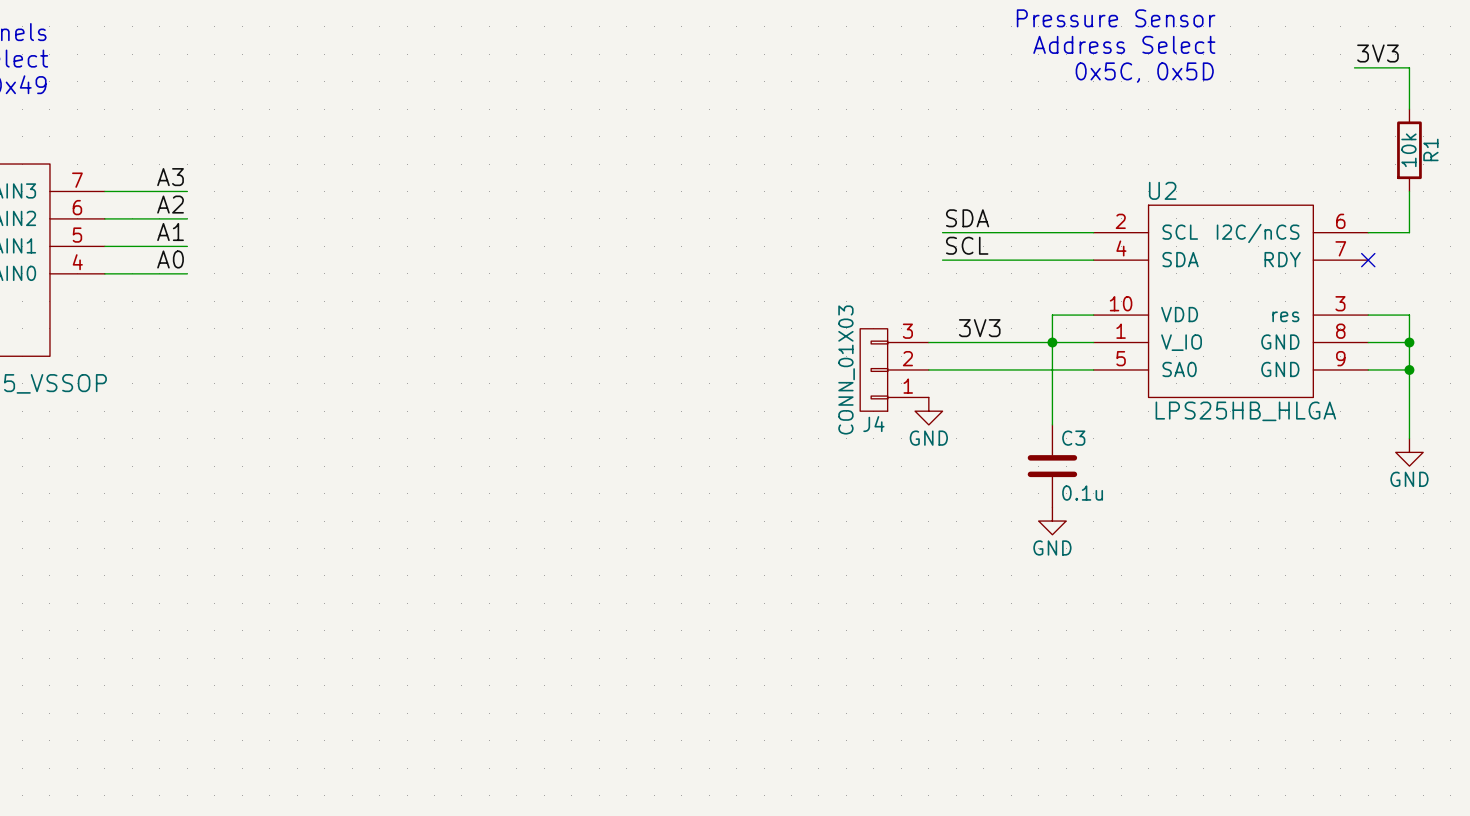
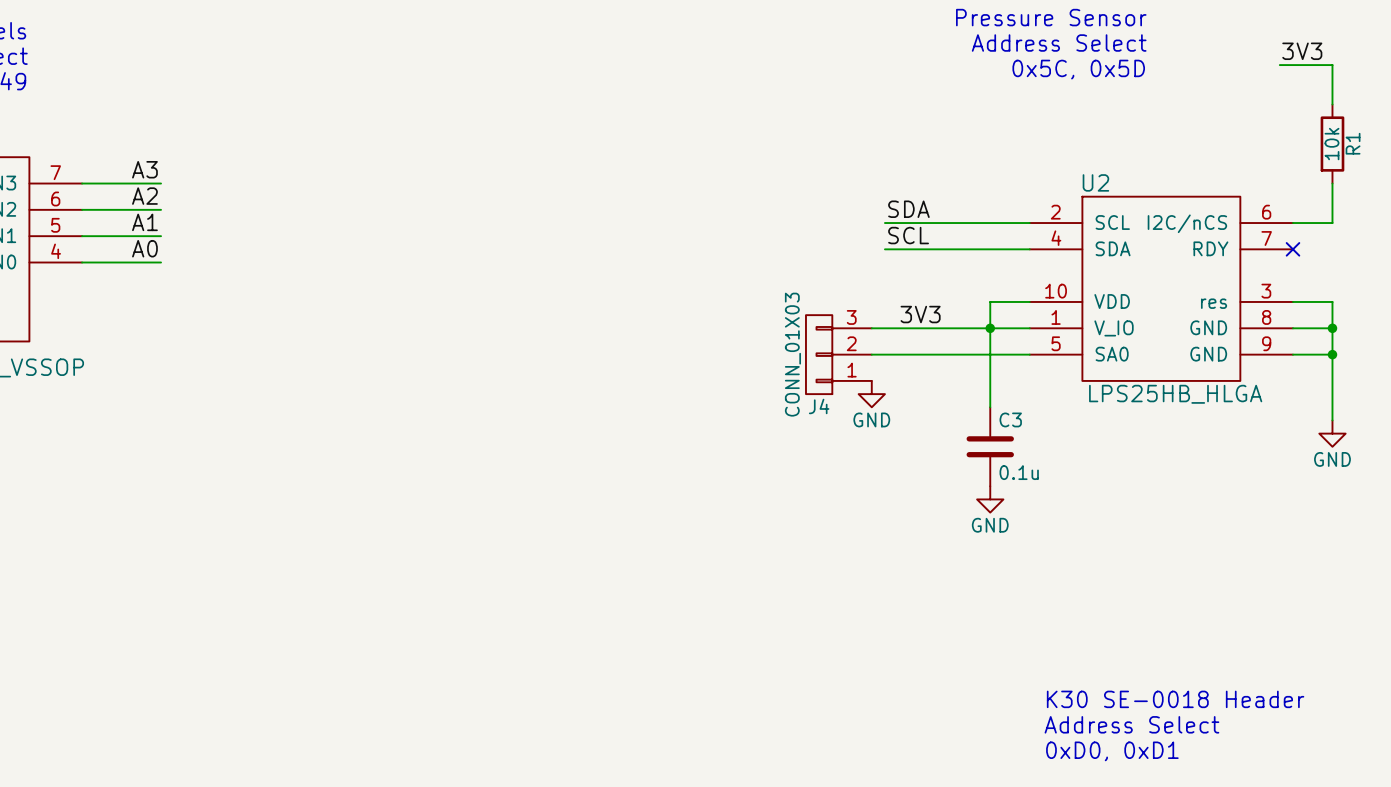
text: none -> K30 SE-0018 Header (1175, 699)
text: none -> Address Select (1131, 724)
text: none -> 0xD0, 0xD1 (1112, 751)

